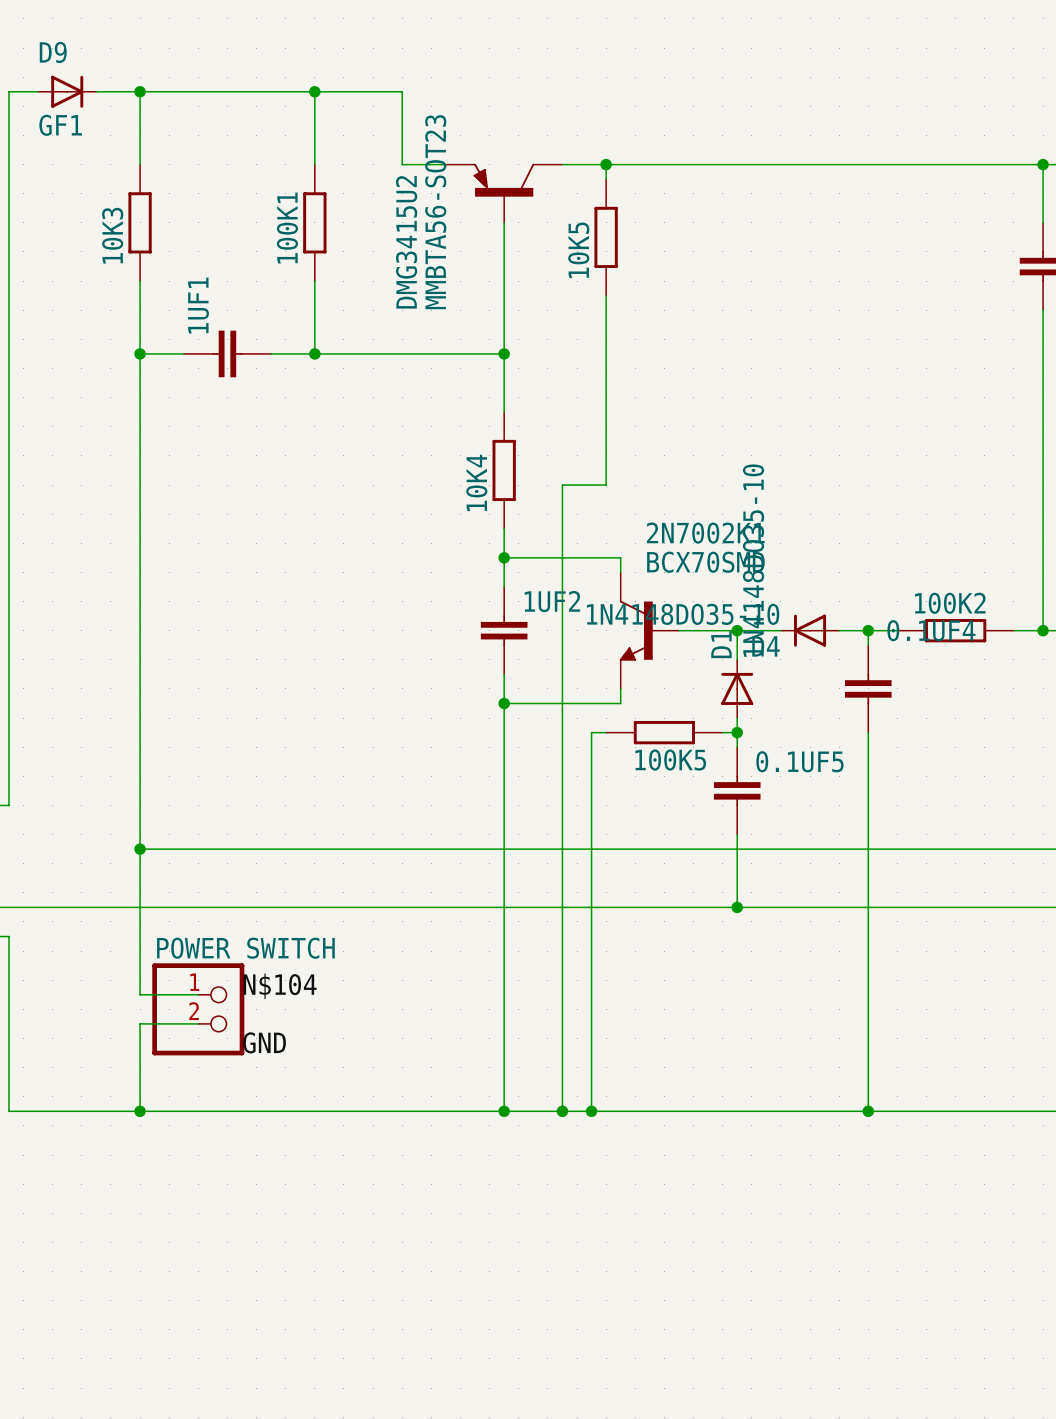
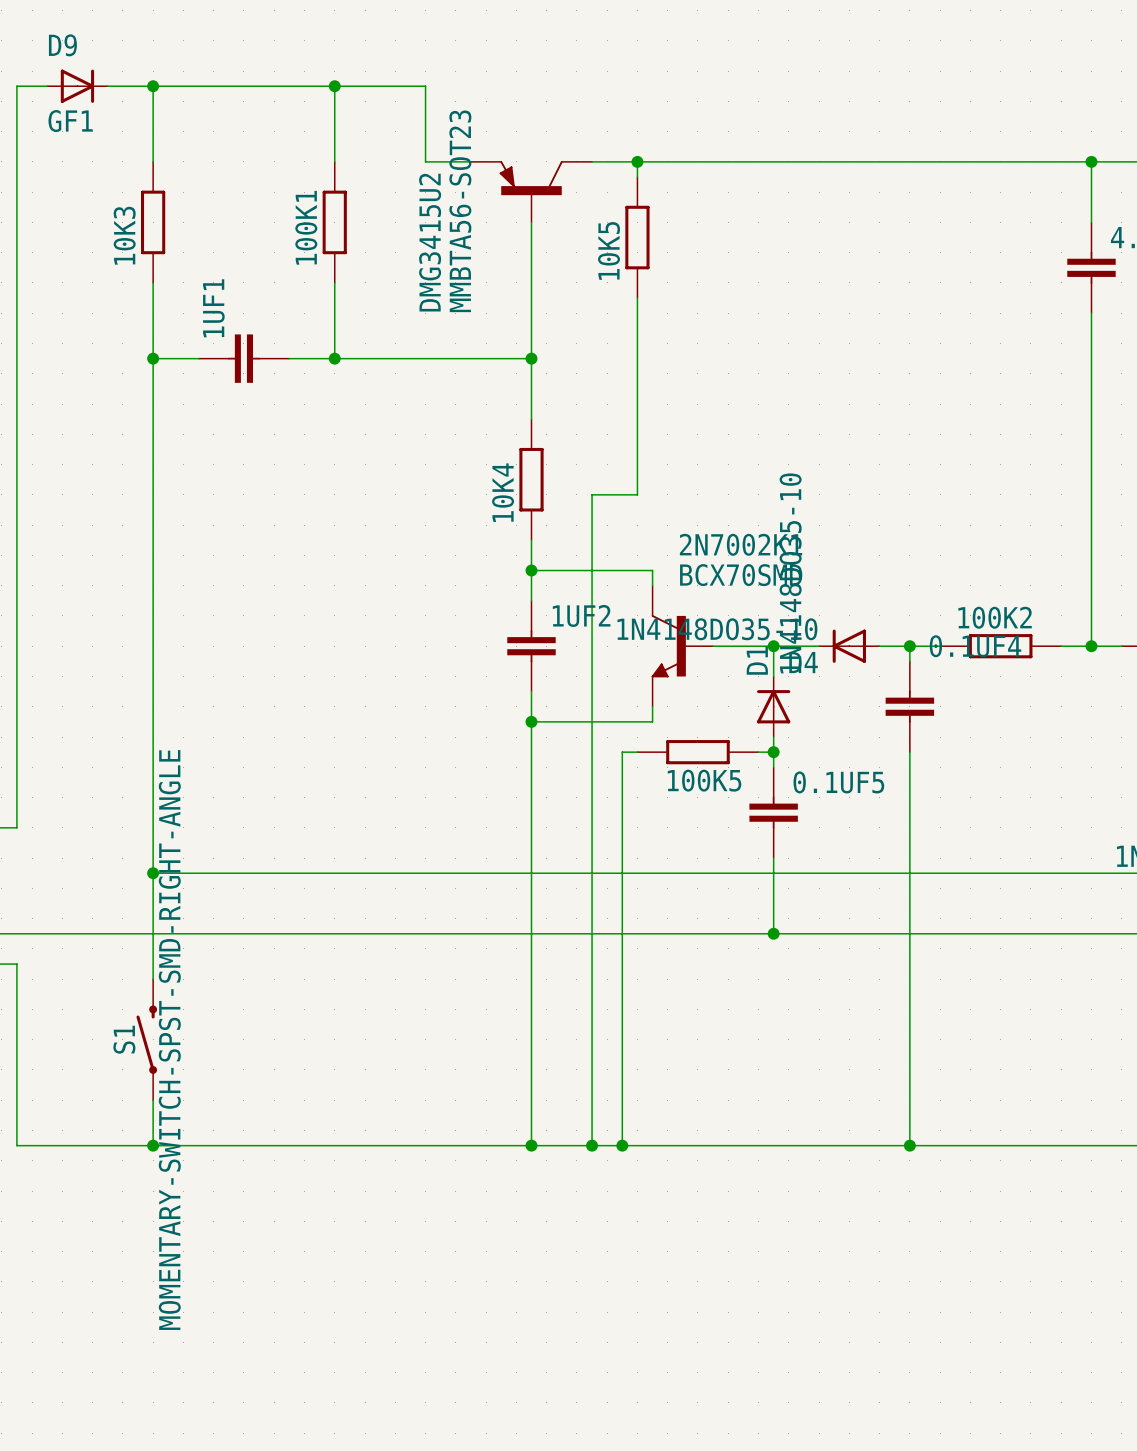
wire: (140, 951) (140, 994) (198, 994) -> none
label: N$104 (280, 986) -> none
S1: none -> MOMENTARY-SWITCH-SPST-SMD-RIGHT-ANGLE (146, 1039)
POWER SWITCH: (198, 1009) -> none
wire: (198, 1023) (140, 1023) (140, 1067) -> none
label: GND (264, 1042) -> none

